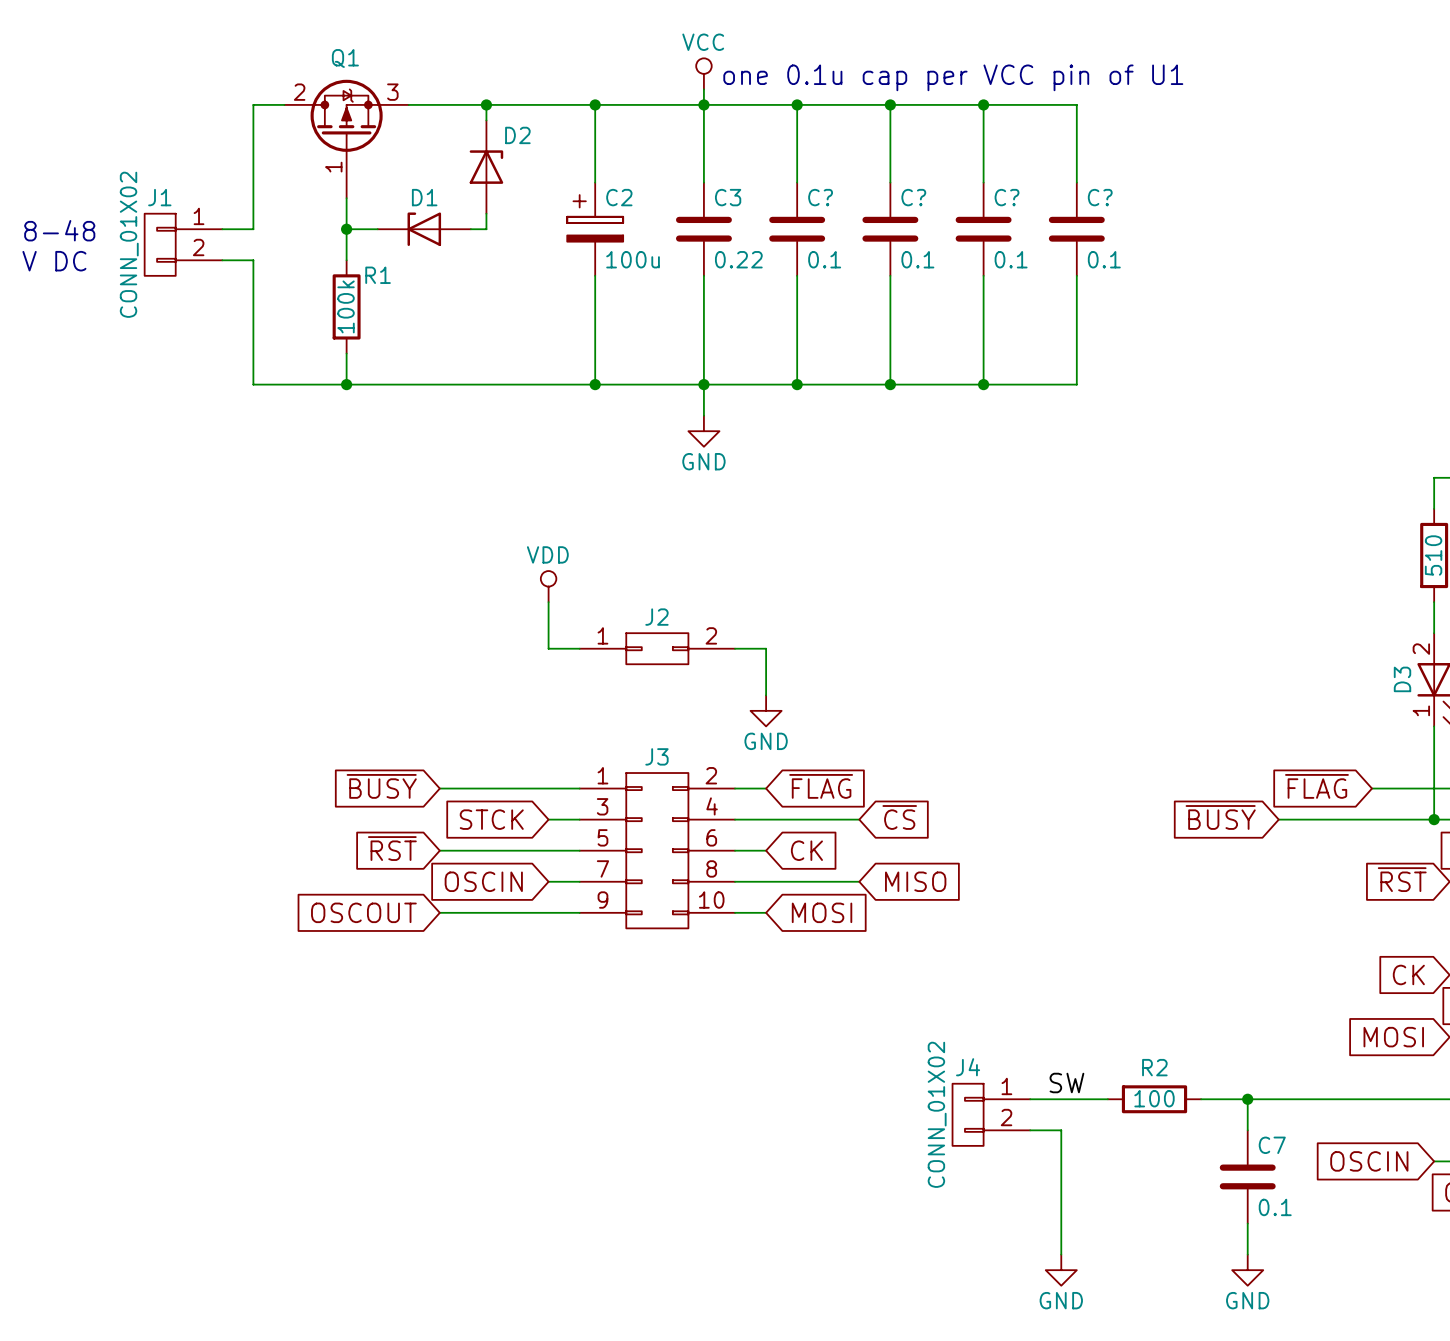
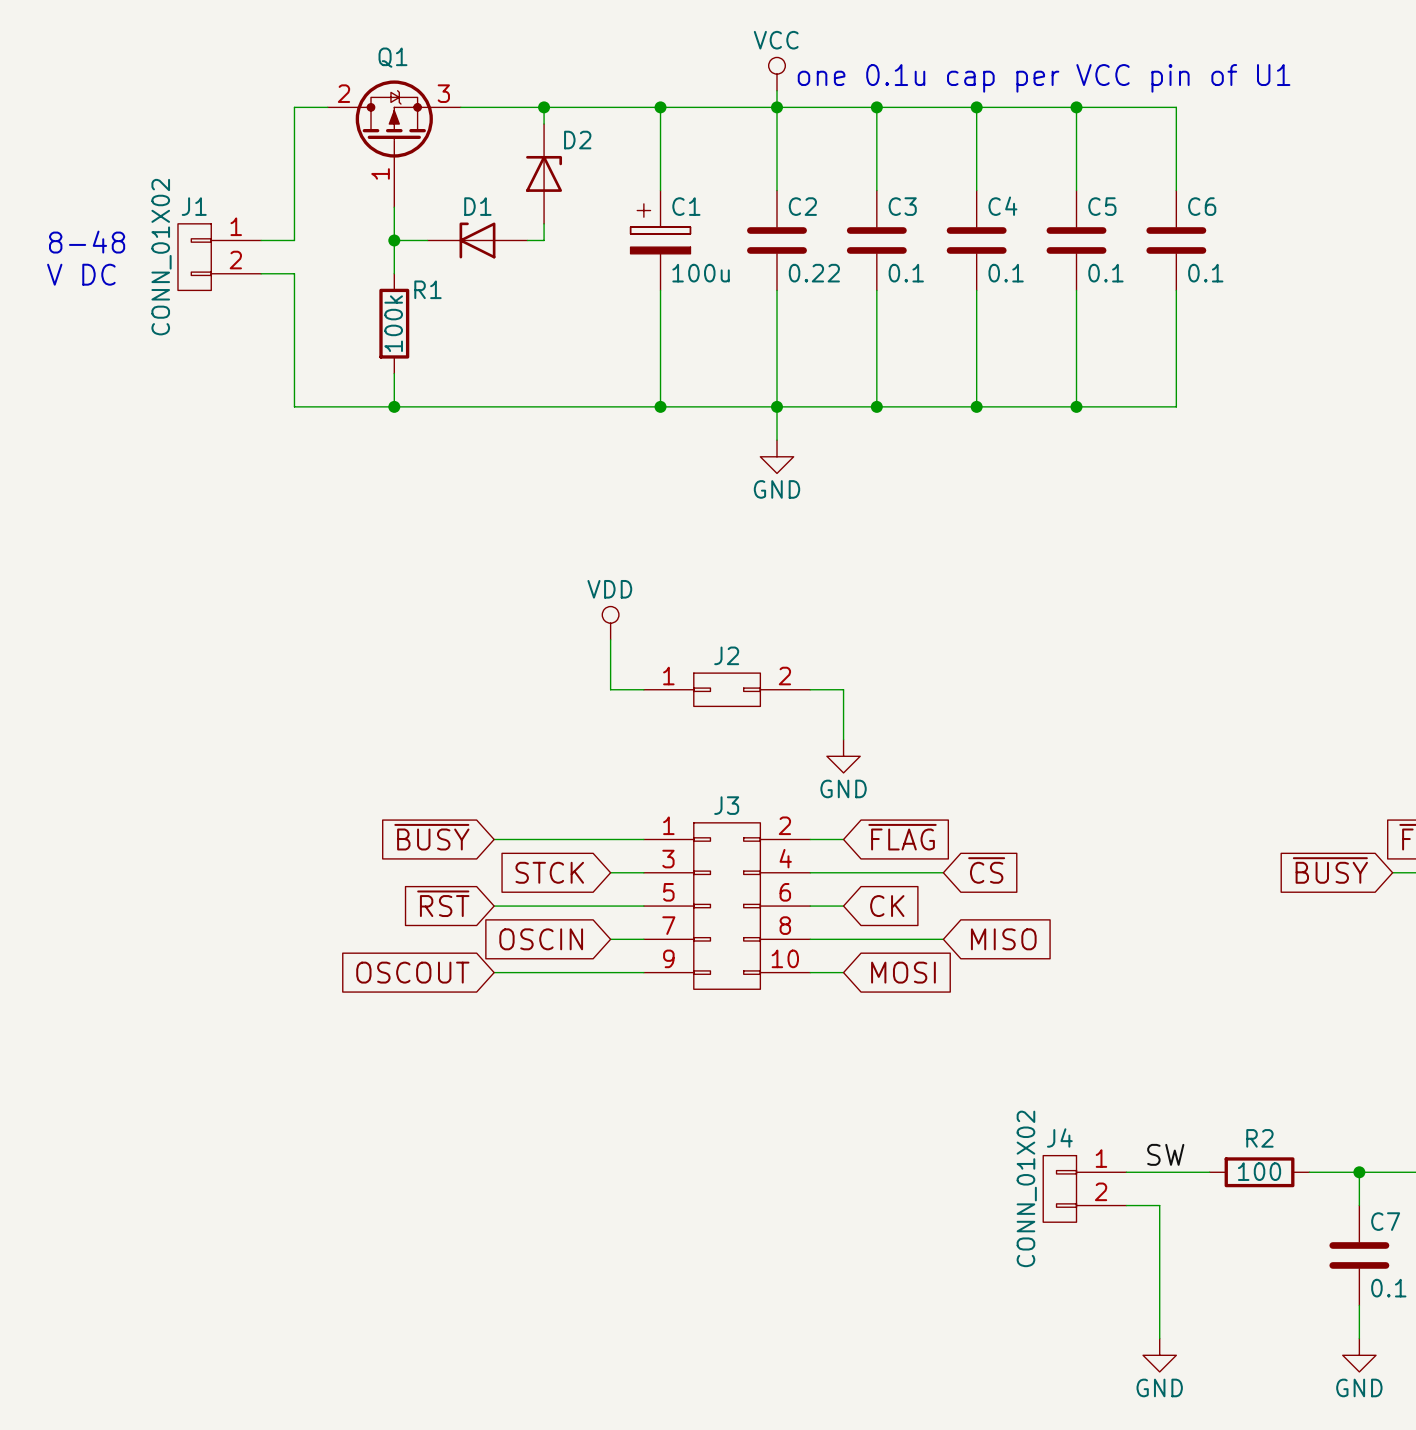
C2 name: C2 (619, 197) -> C1 (686, 206)
C3 name: C3 (728, 197) -> C2 (802, 206)
C? name: C? (820, 197) -> C3 (902, 206)
C? name: C? (913, 197) -> C4 (1002, 206)
C? name: C? (1007, 197) -> C5 (1102, 206)
C? name: C? (1100, 197) -> C6 (1202, 206)

